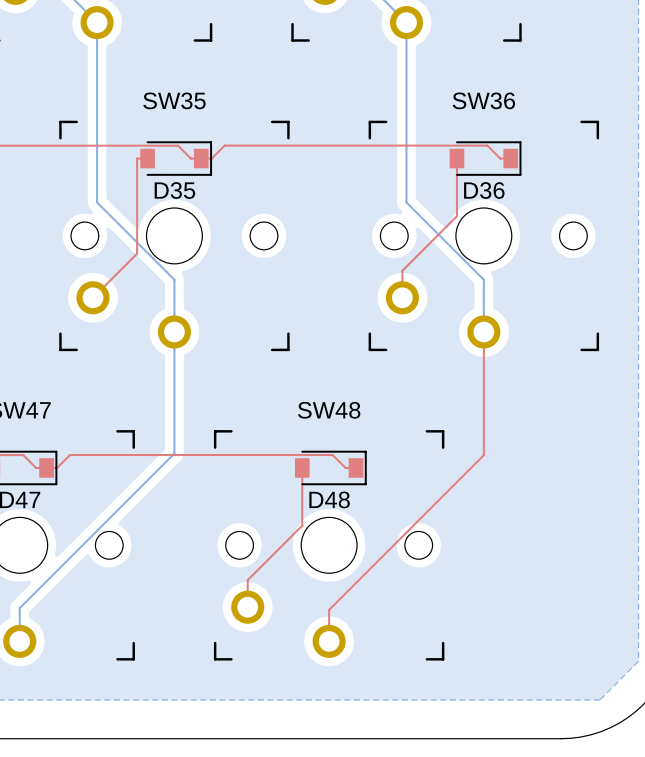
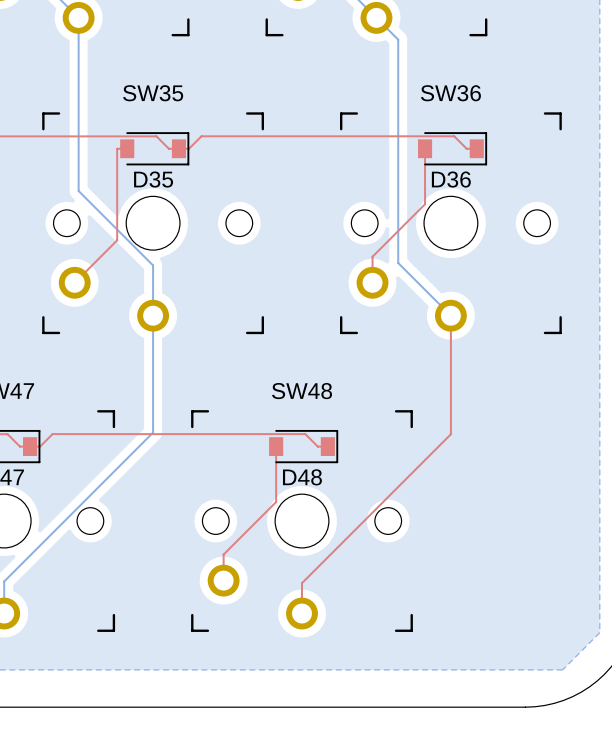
bottom track: (406, 22) (406, 202) (483, 279) (483, 332) -> (376, 17) (398, 39) (398, 263) (450, 315)

